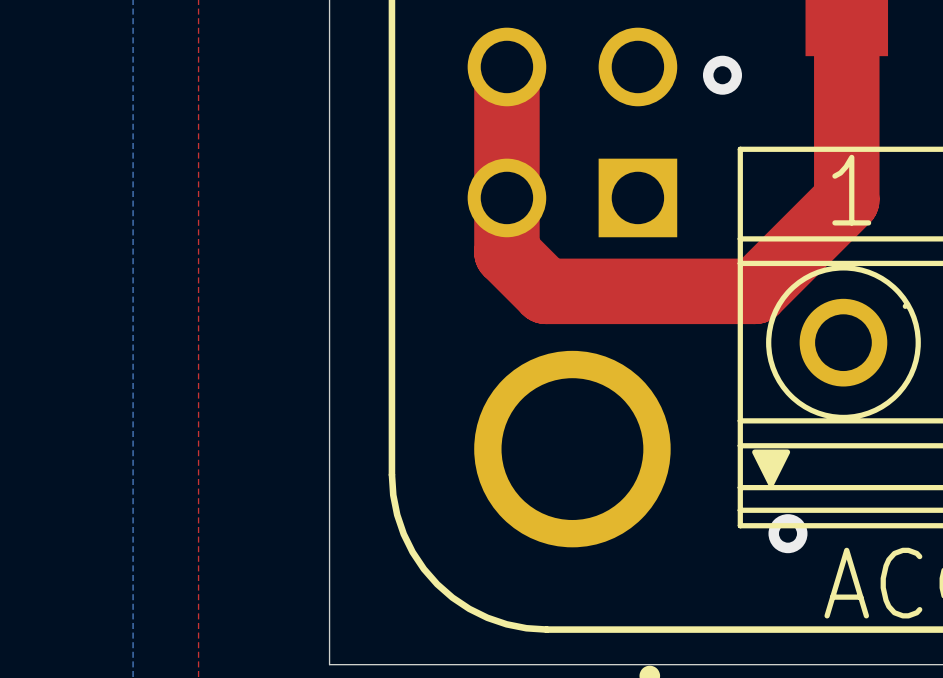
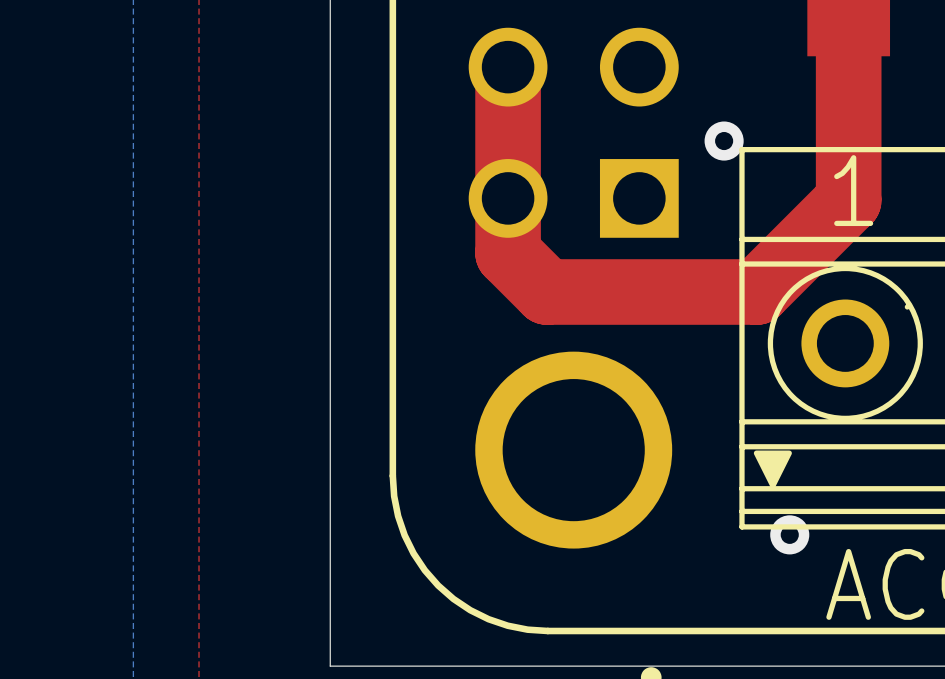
via position: (722, 75) -> (724, 141)

